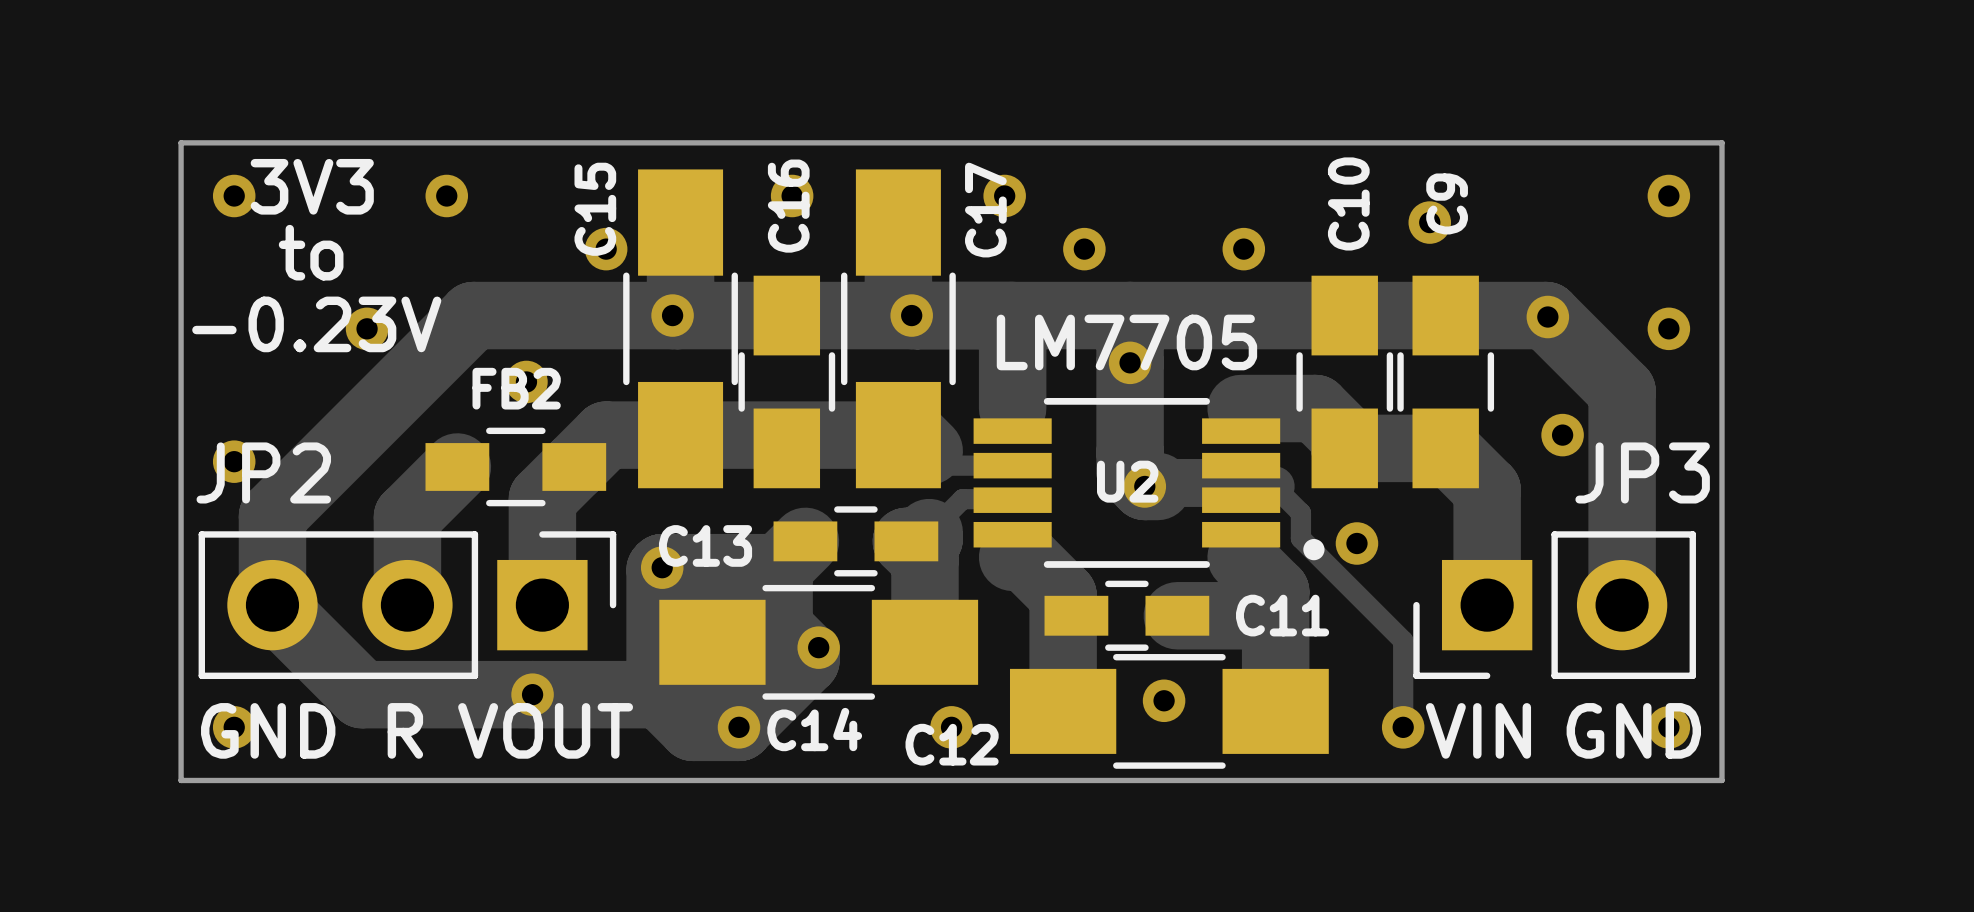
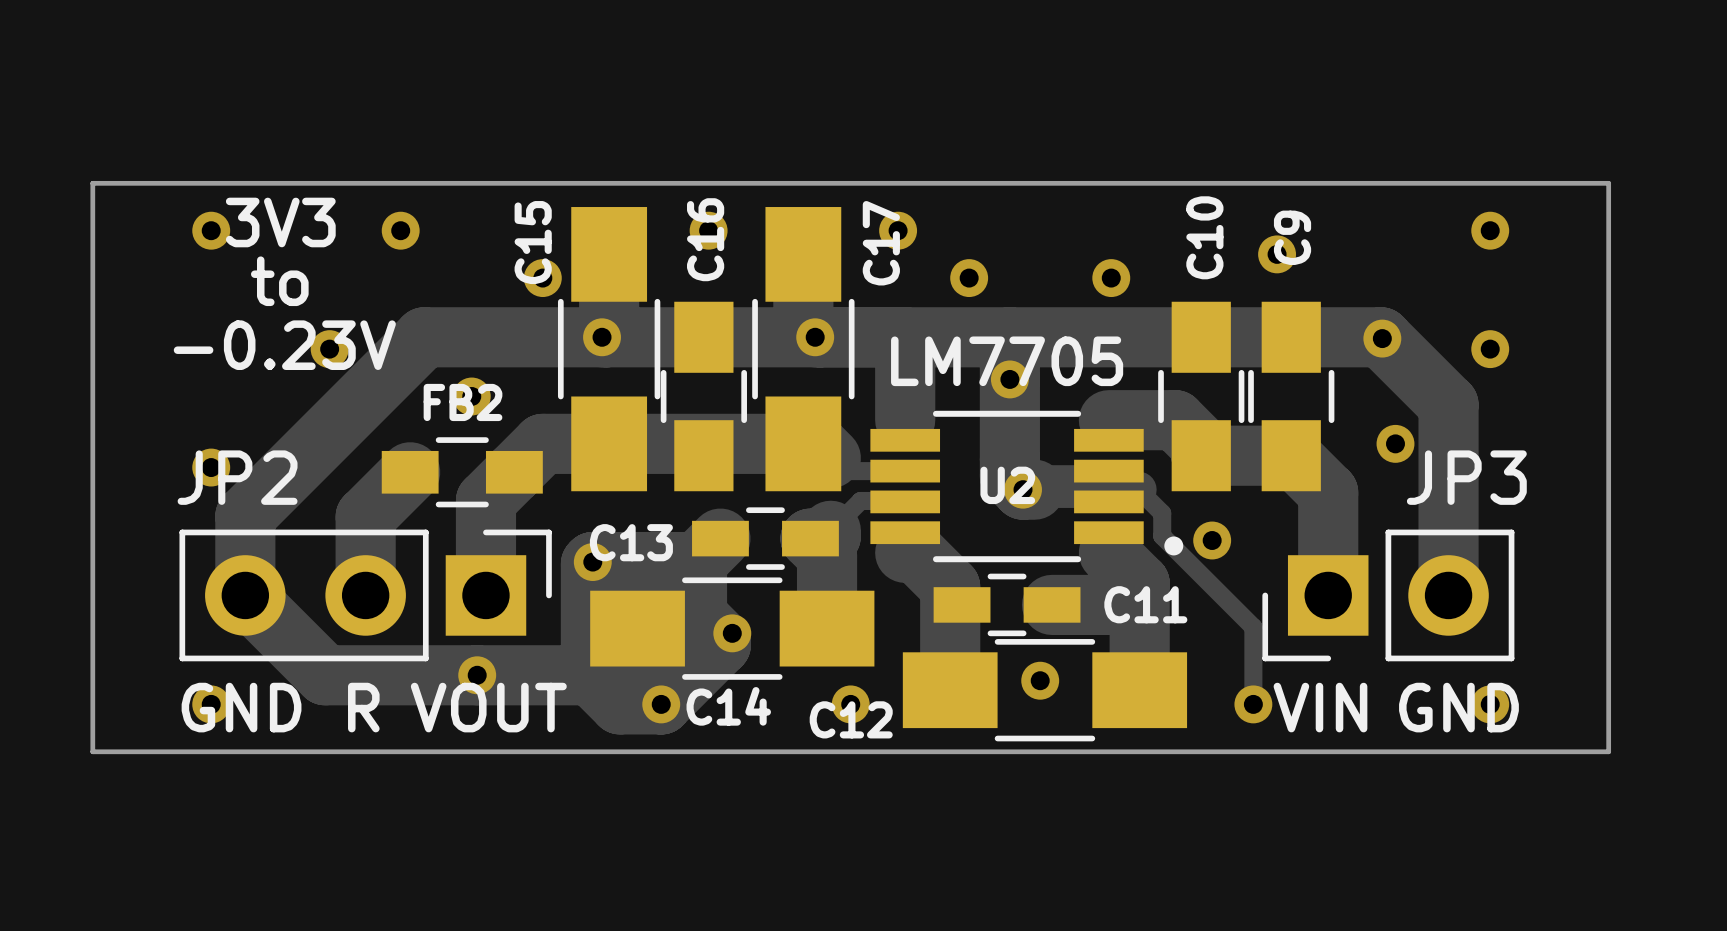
board edge: (181, 142) (181, 780) -> (163, 183) (92, 183) (92, 751) (163, 751)
board edge: (1722, 142) (1722, 780) -> (1537, 183) (1608, 183) (1608, 751) (1537, 751)

